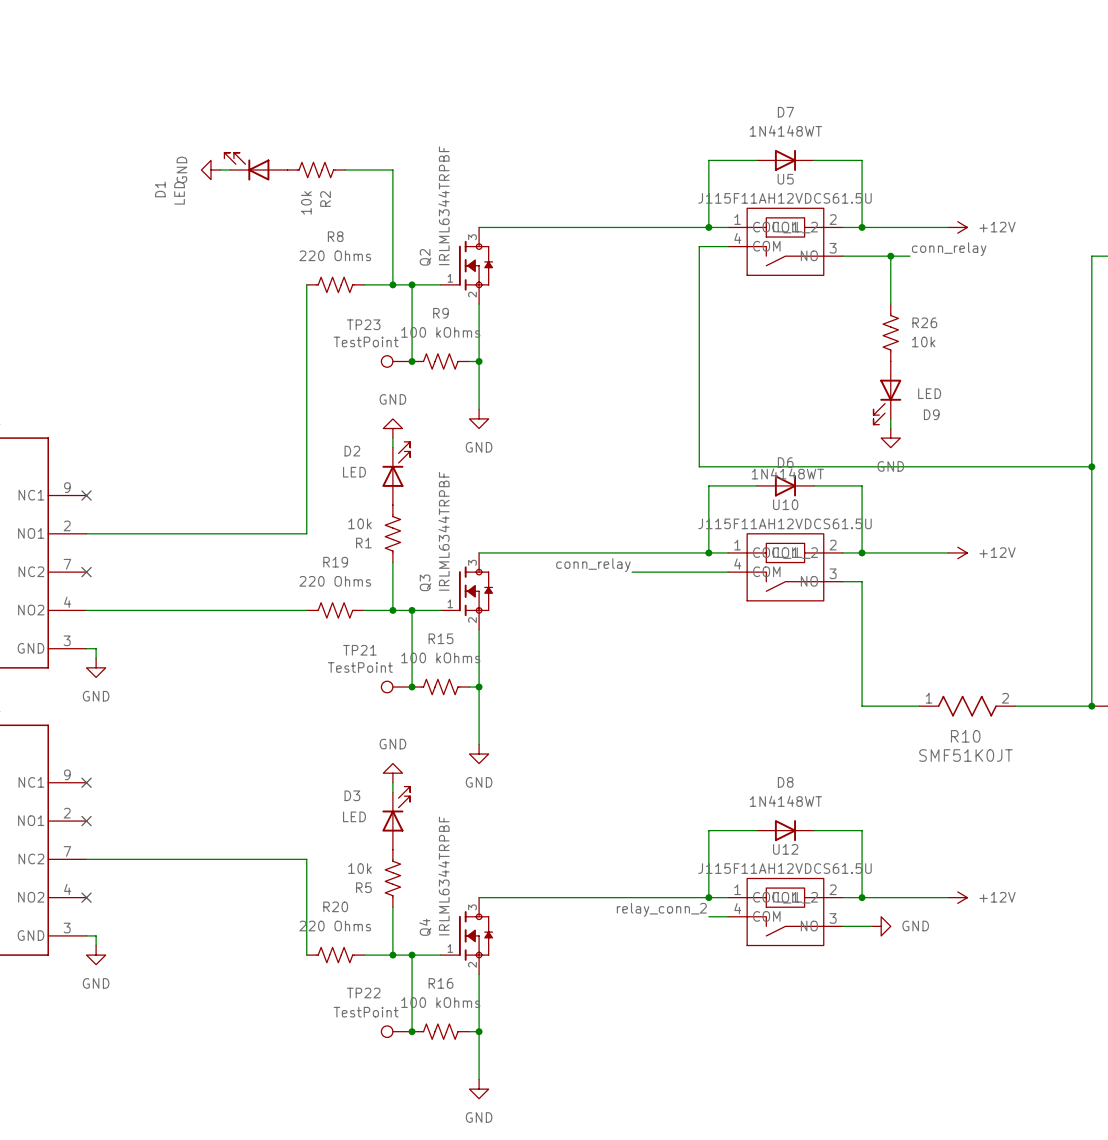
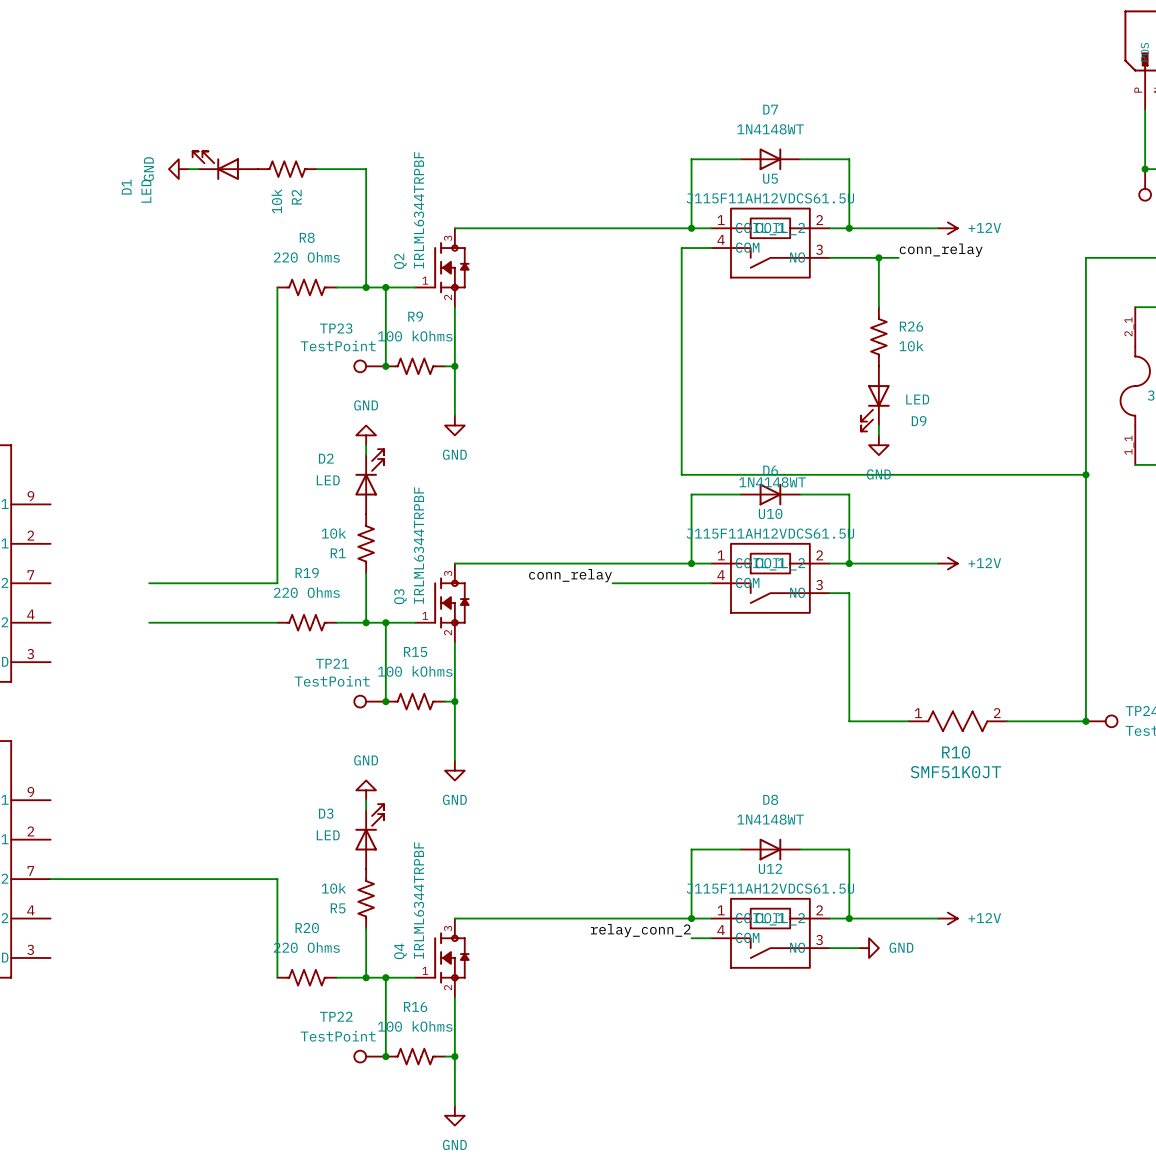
no-connect mark: (86, 495) -> none
wire: (86, 533) (306, 533) -> (149, 583) (277, 583) (277, 543)
no-connect mark: (86, 572) -> none
wire: (86, 610) (182, 610) -> none
wire: (86, 648) (96, 648) (96, 658) -> none
power symbol: GND (96, 667) -> none
no-connect mark: (86, 782) -> none
no-connect mark: (86, 821) -> none
no-connect mark: (86, 897) -> none
wire: (86, 935) (96, 935) (96, 945) -> none
power symbol: GND (96, 955) -> none

